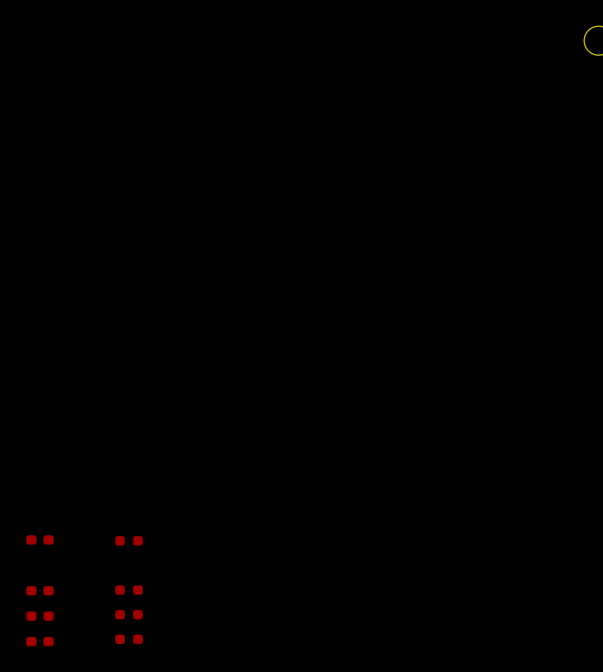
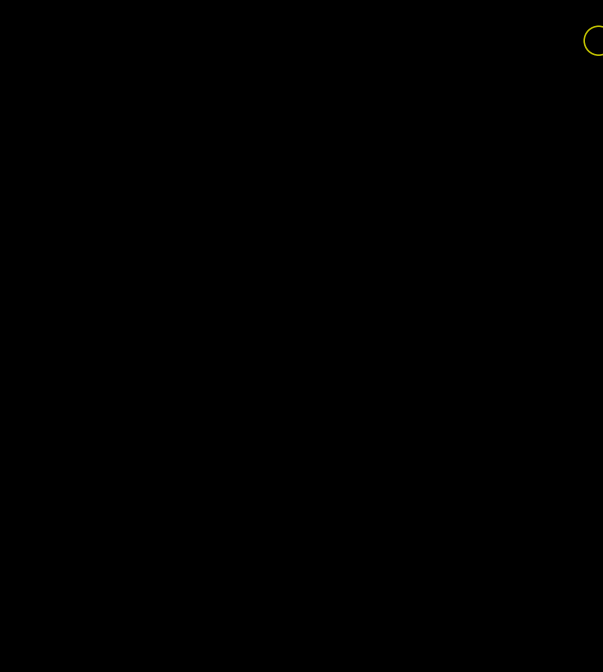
part: (39, 539) -> none
part: (129, 540) -> none
part: (39, 590) -> none
part: (129, 590) -> none
part: (129, 614) -> none
part: (39, 616) -> none
part: (129, 639) -> none
part: (39, 641) -> none

